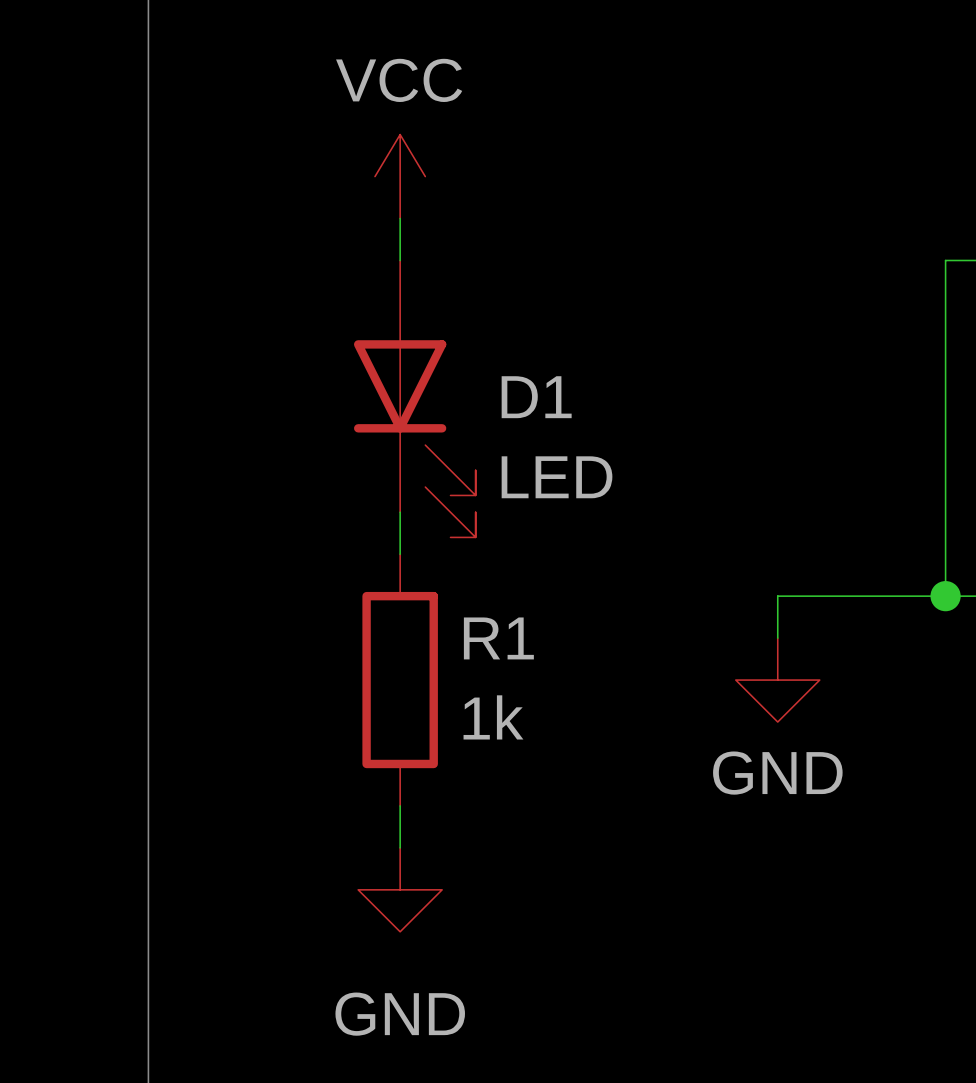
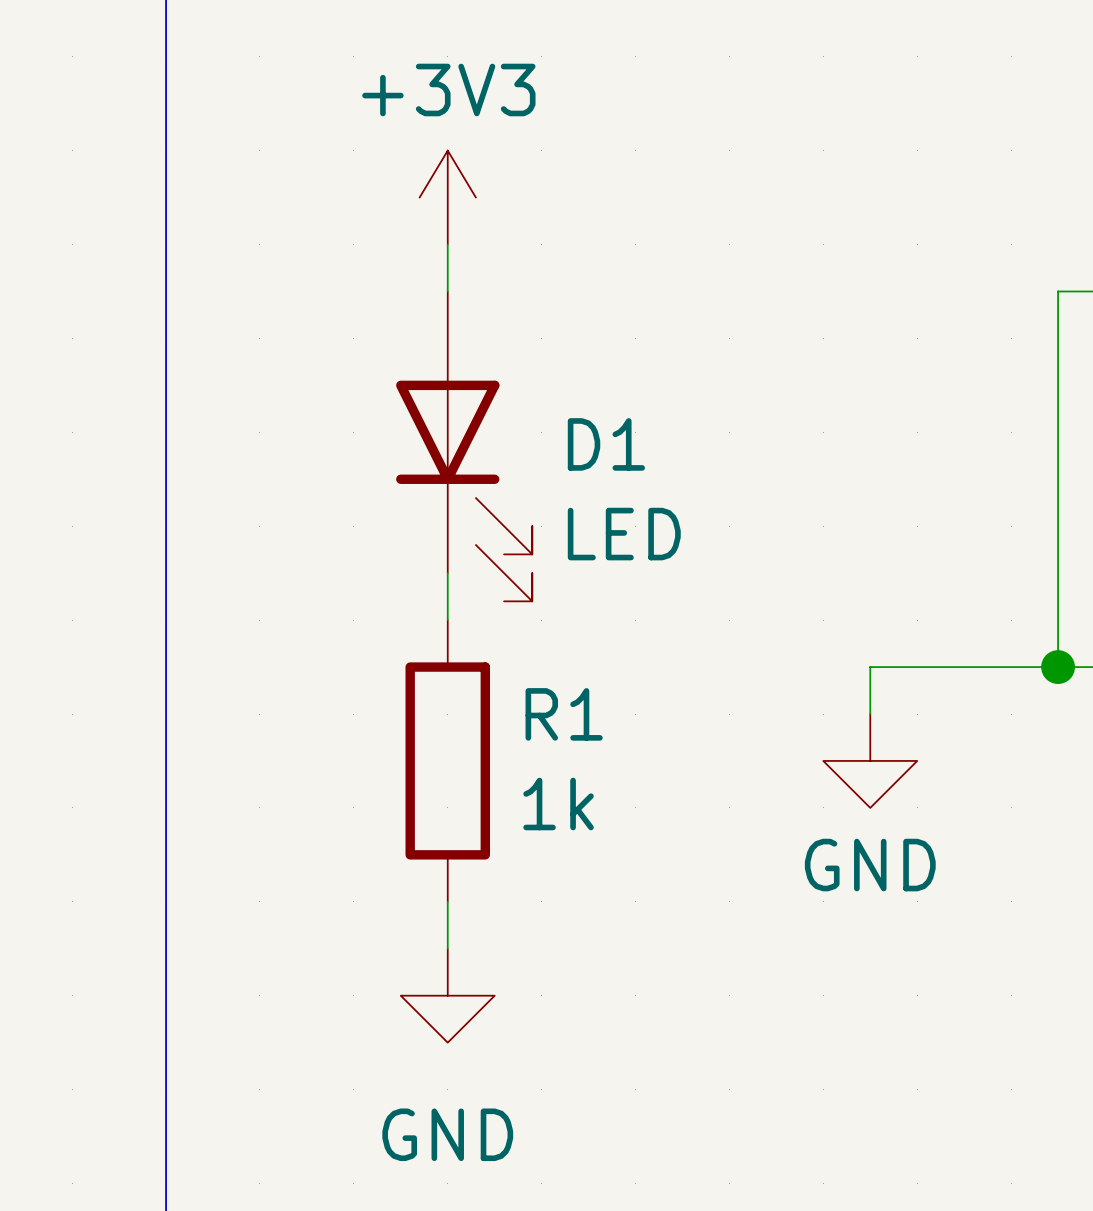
power symbol: VCC (400, 176) -> +3V3 (447, 197)

